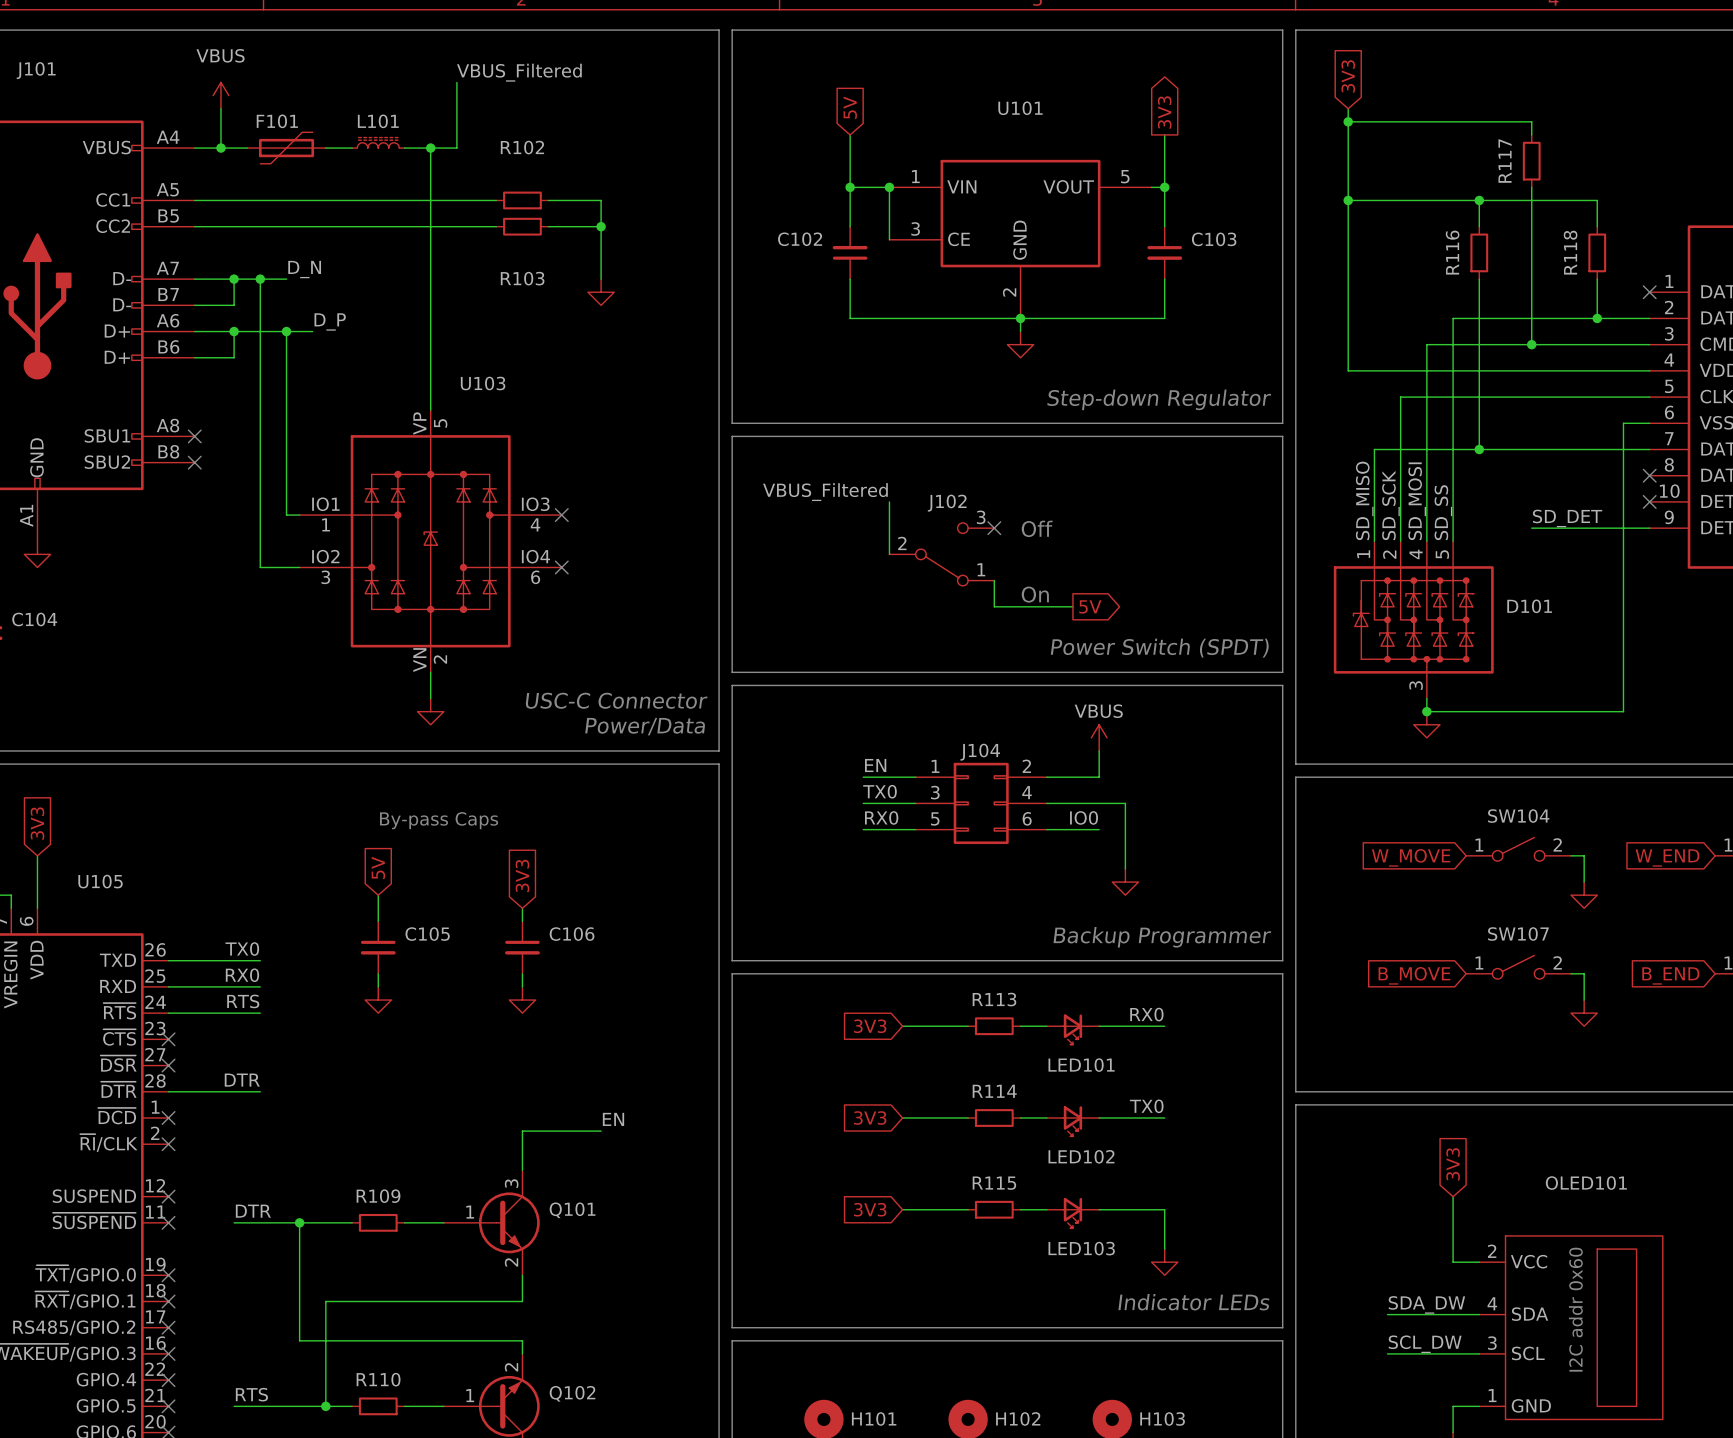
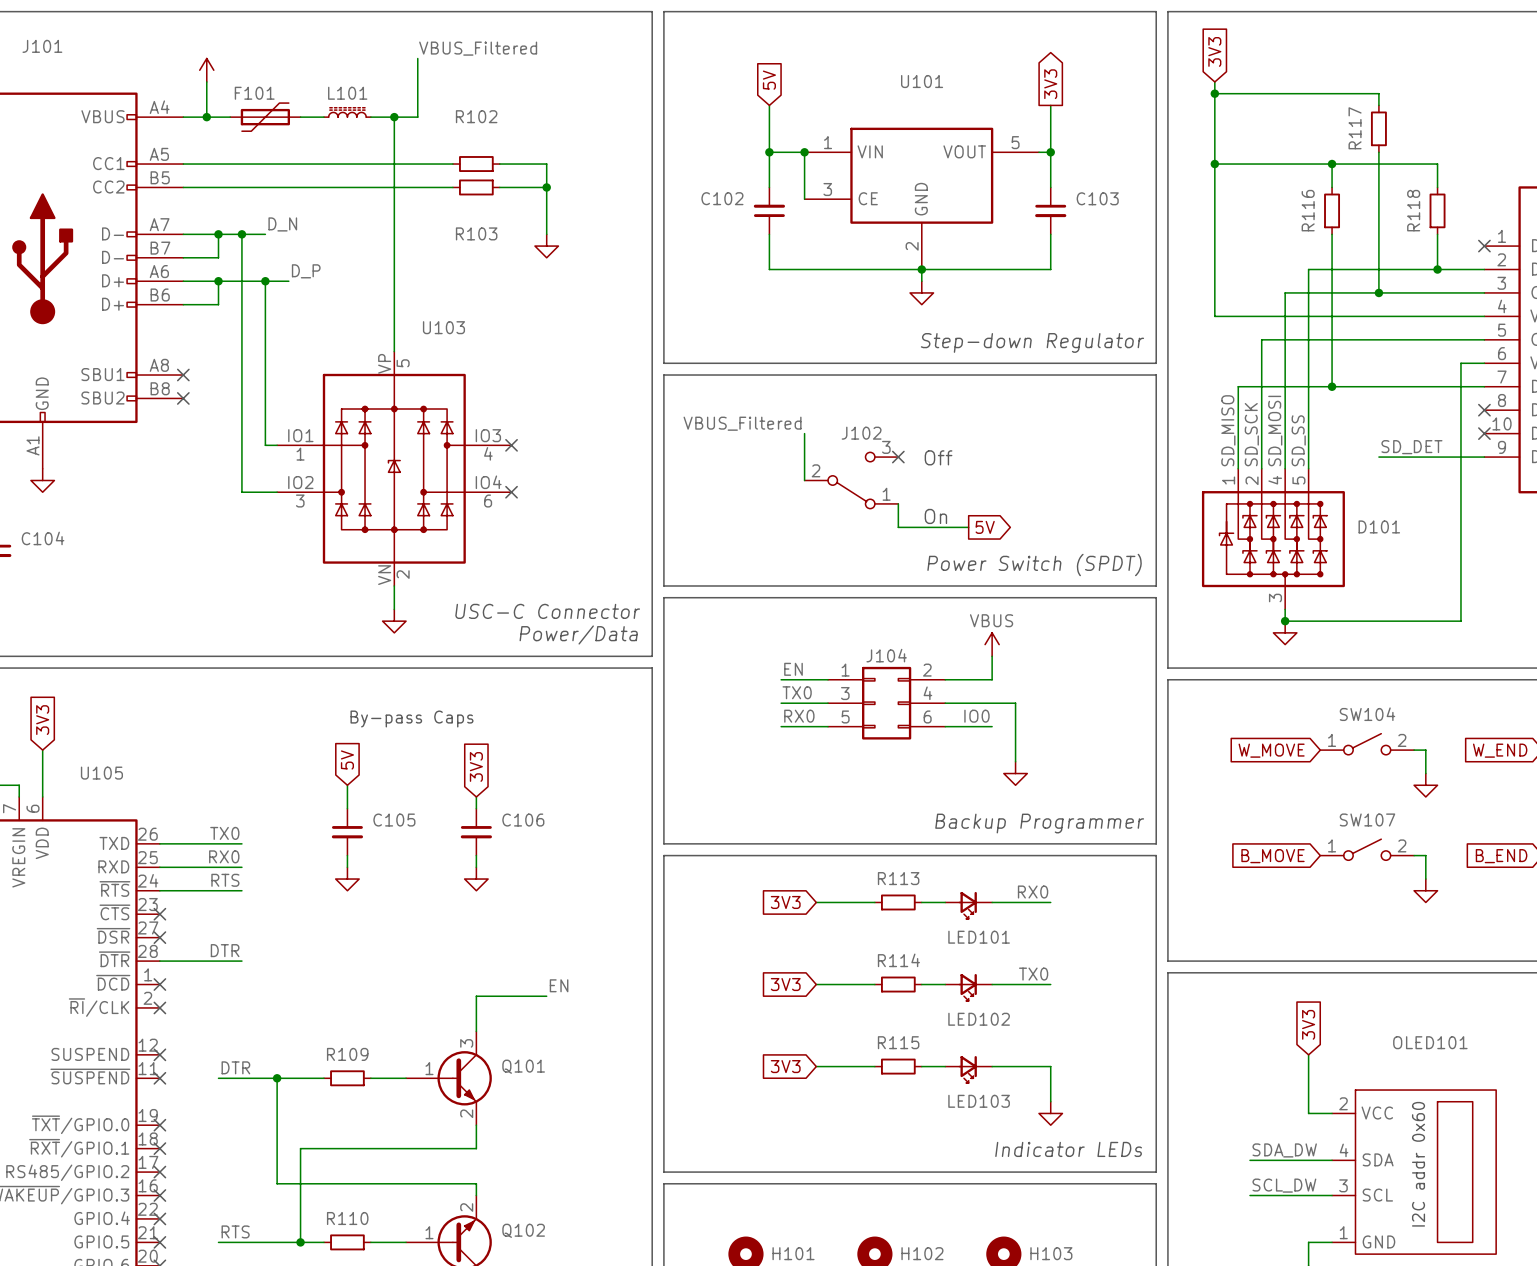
power symbol text: VBUS (220, 55) -> none

